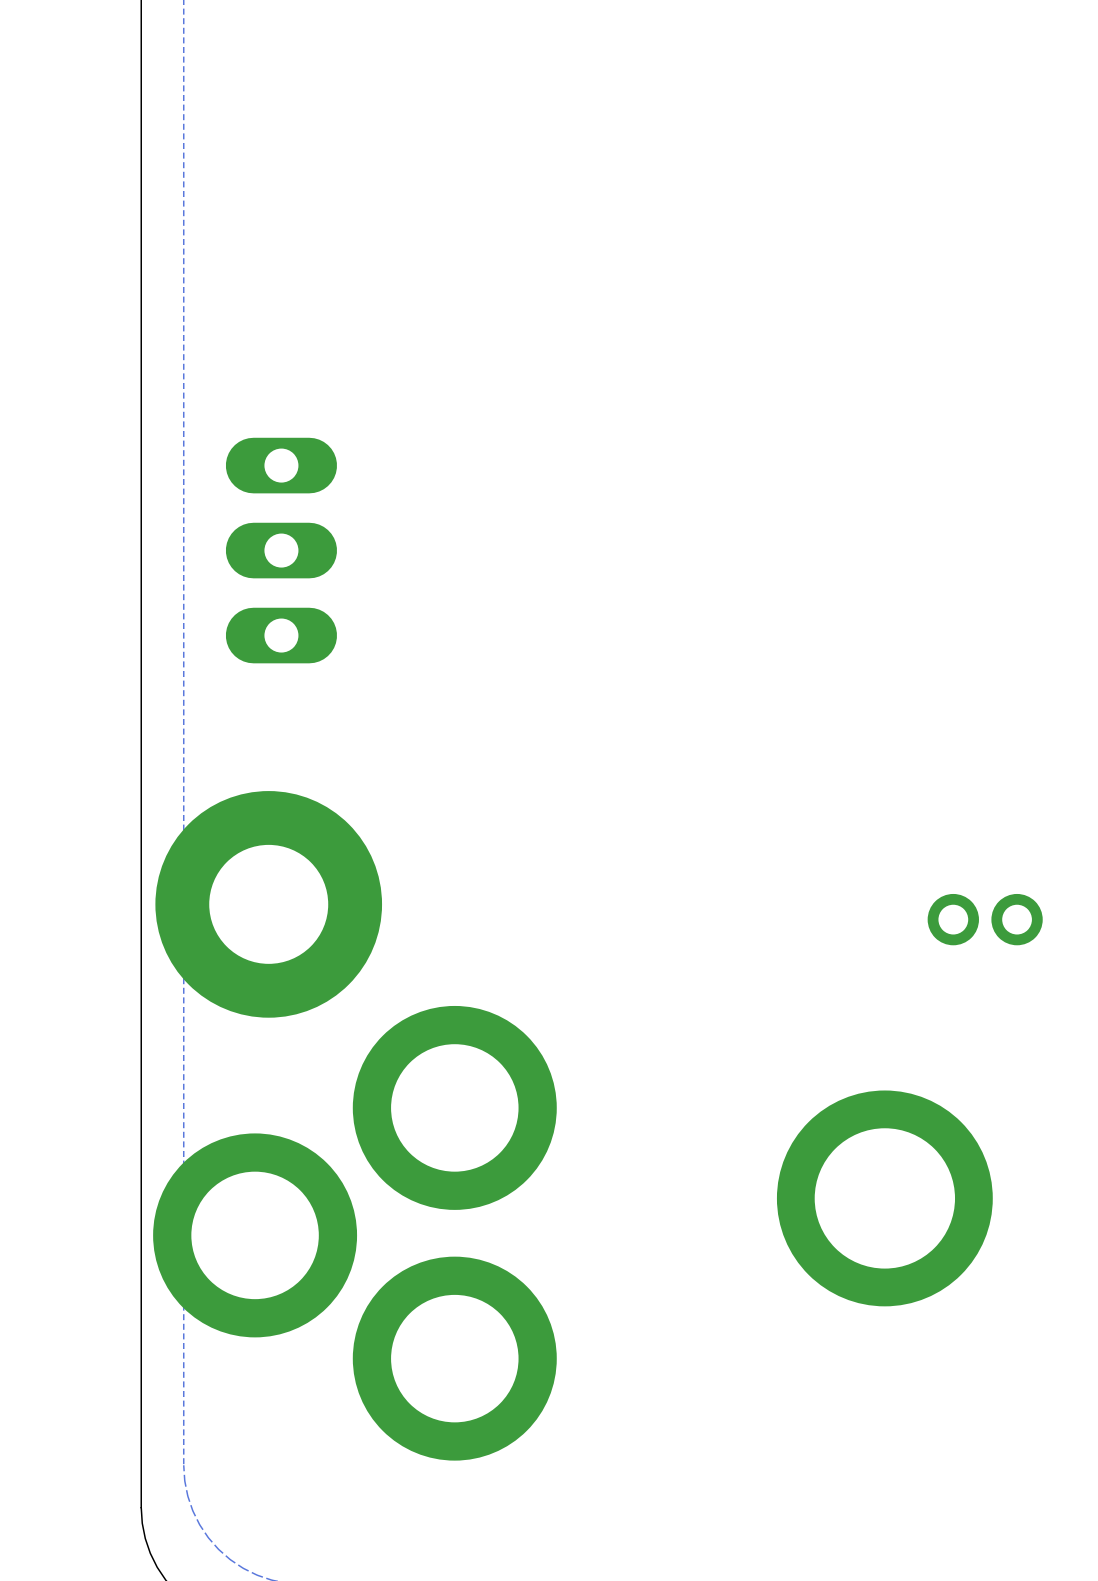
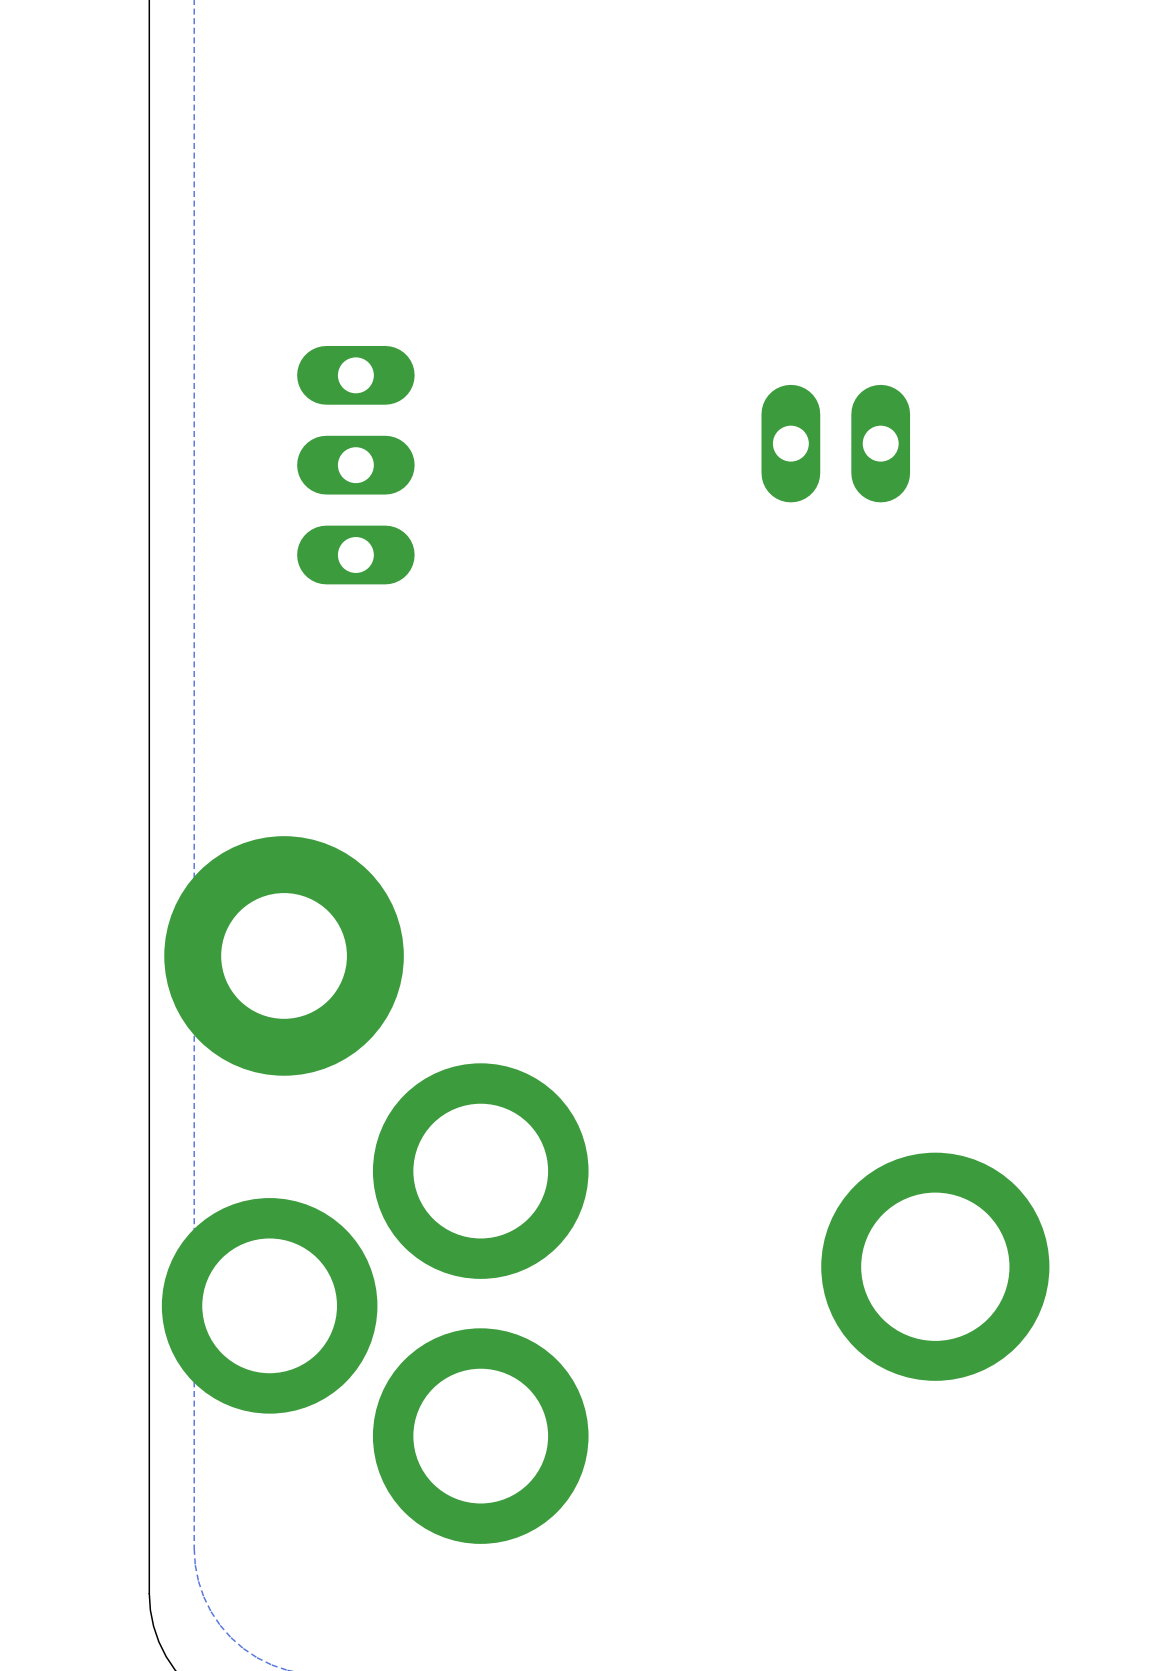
part: none -> (835, 443)
part position: (281, 550) -> (355, 465)
part: (985, 919) -> none

